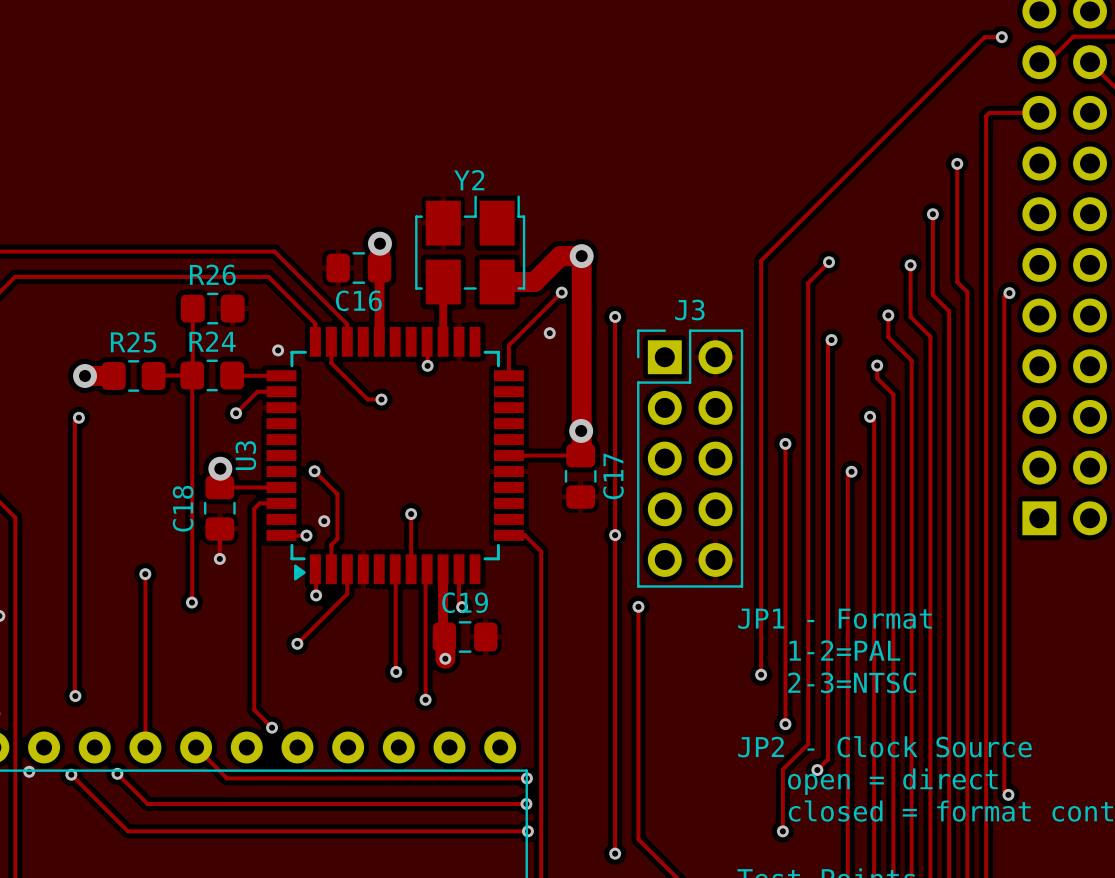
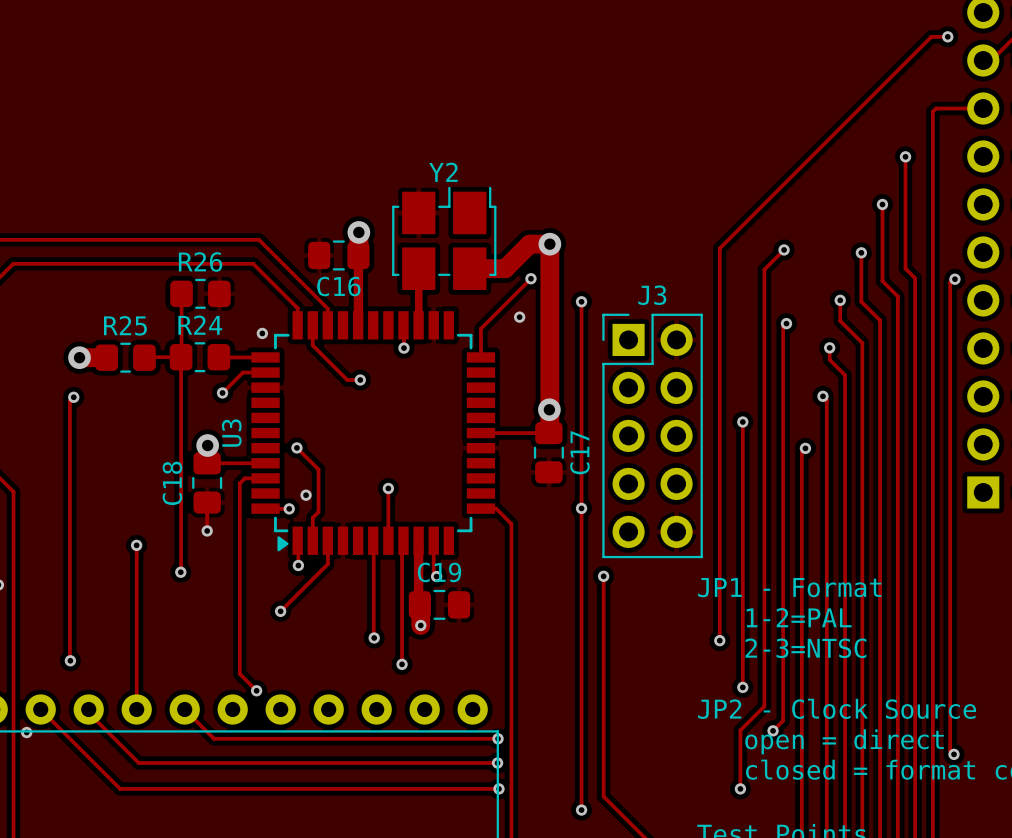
track: none -> (40, 709) (66, 735)
track: none -> (88, 709) (88, 712) (110, 734)
via: (117, 773) -> none
via: (71, 774) -> none

